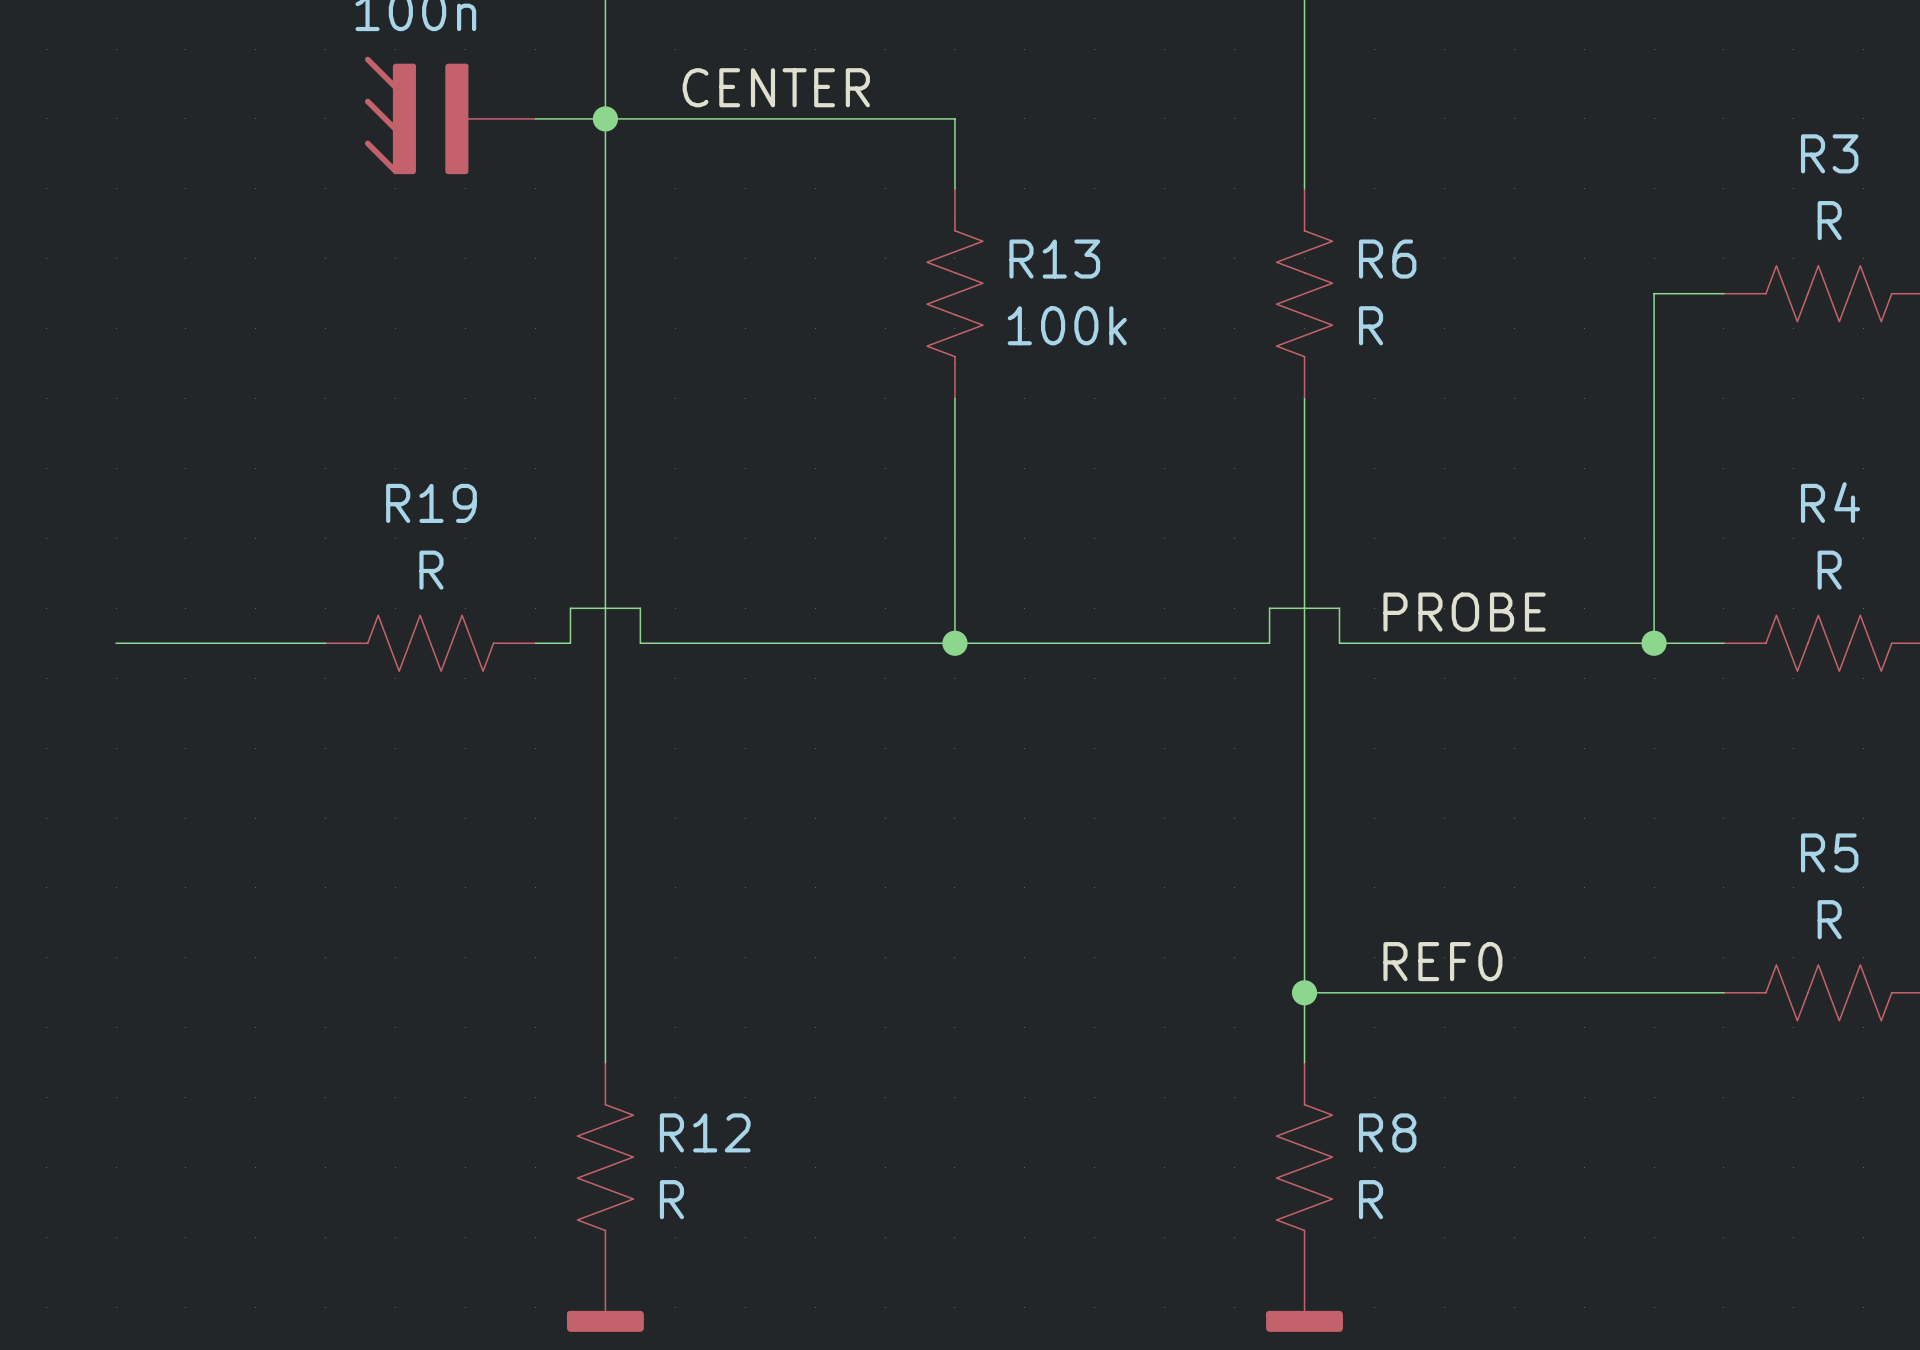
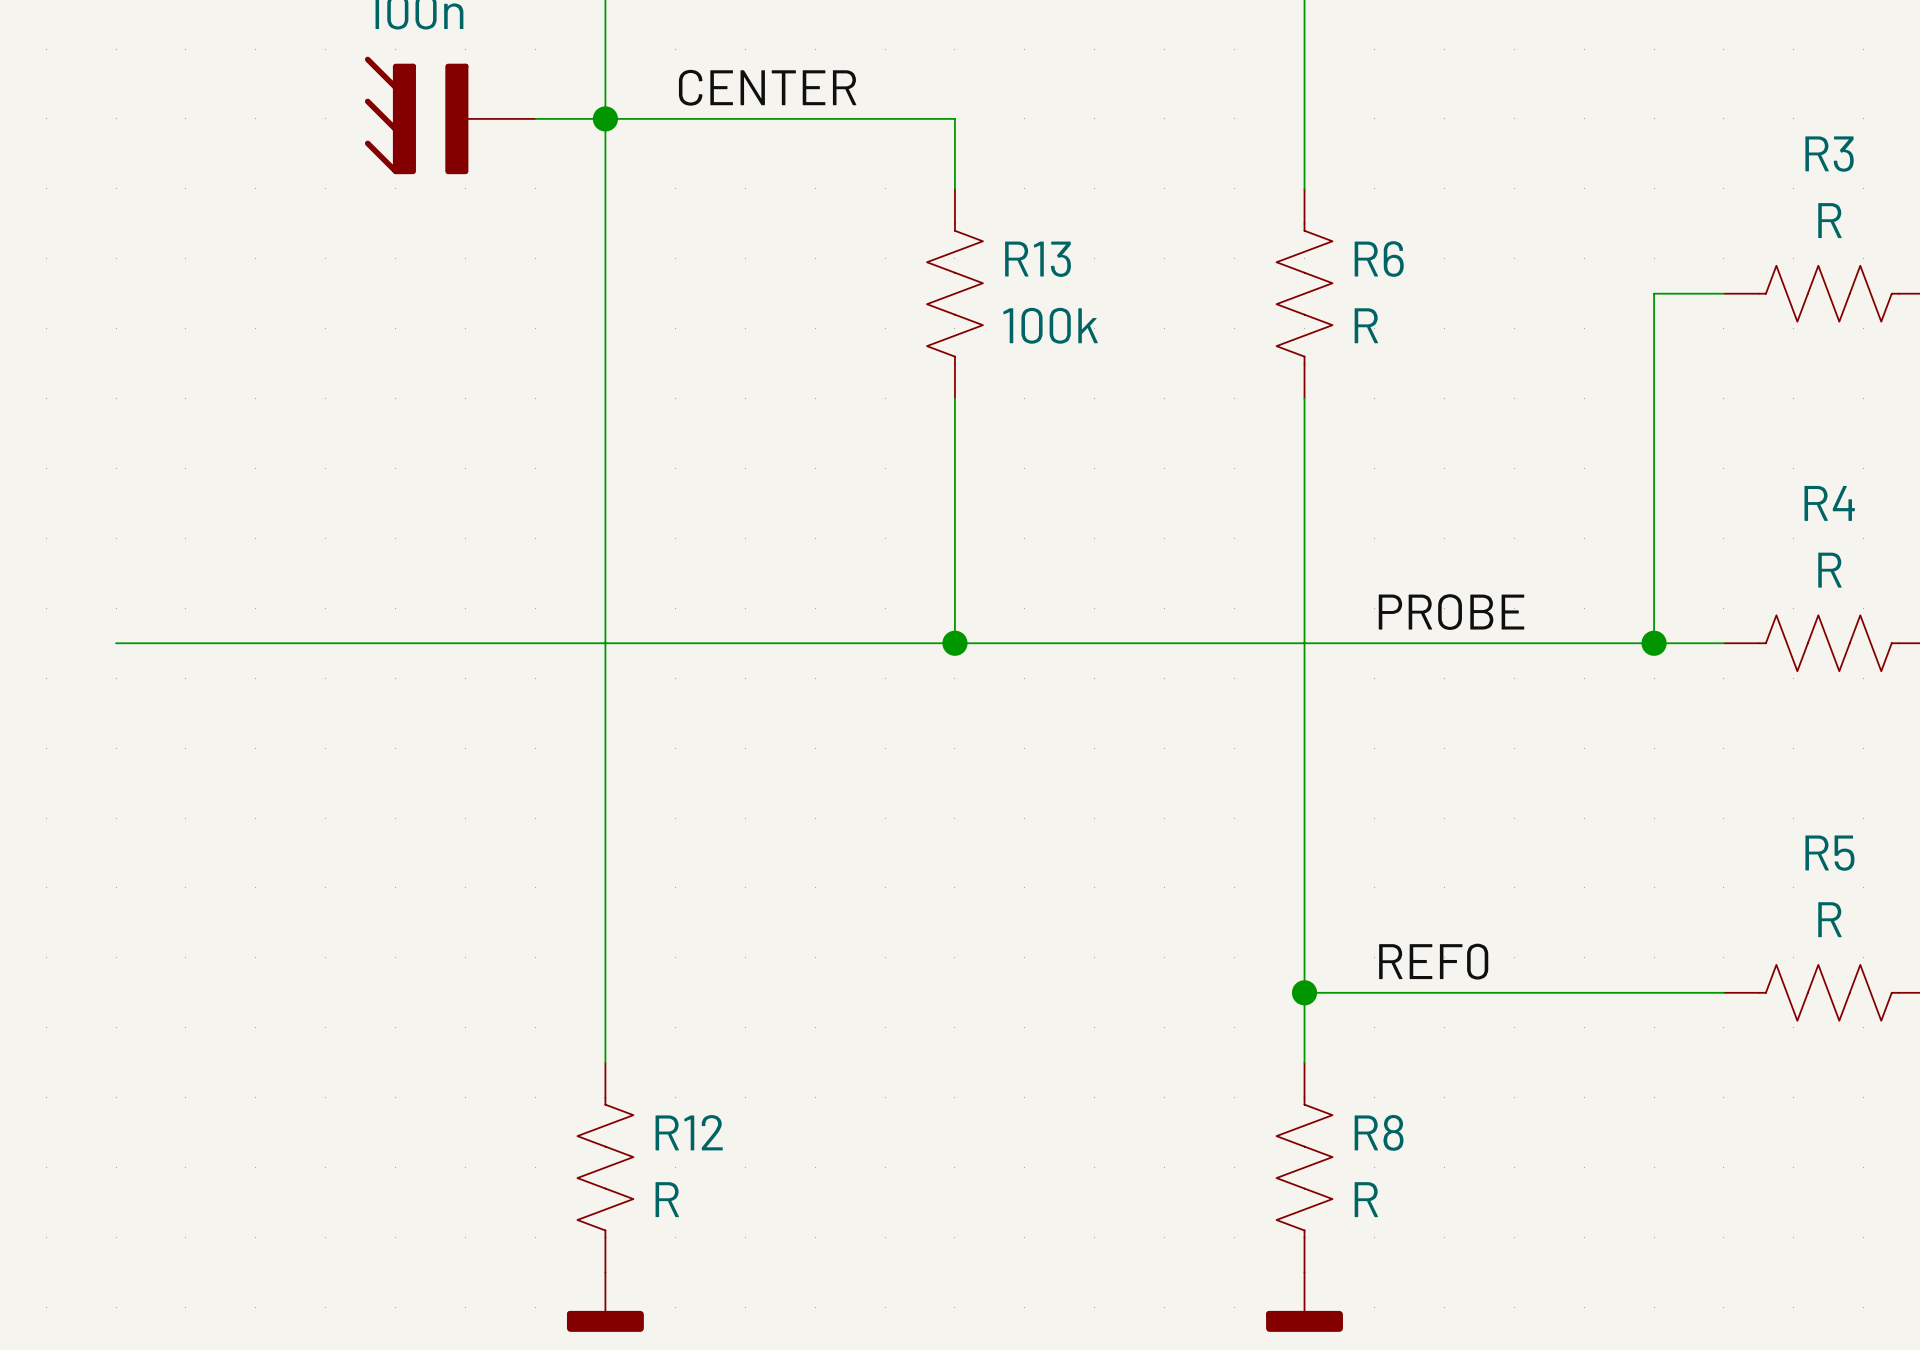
wire: none -> (325, 643) (535, 643)
R19: R (430, 643) -> none
wire: (570, 643) (570, 608) (640, 608) (640, 643) -> (570, 643) (640, 643)
wire: (1269, 643) (1269, 608) (1339, 608) (1339, 643) -> (1269, 643) (1339, 643)

